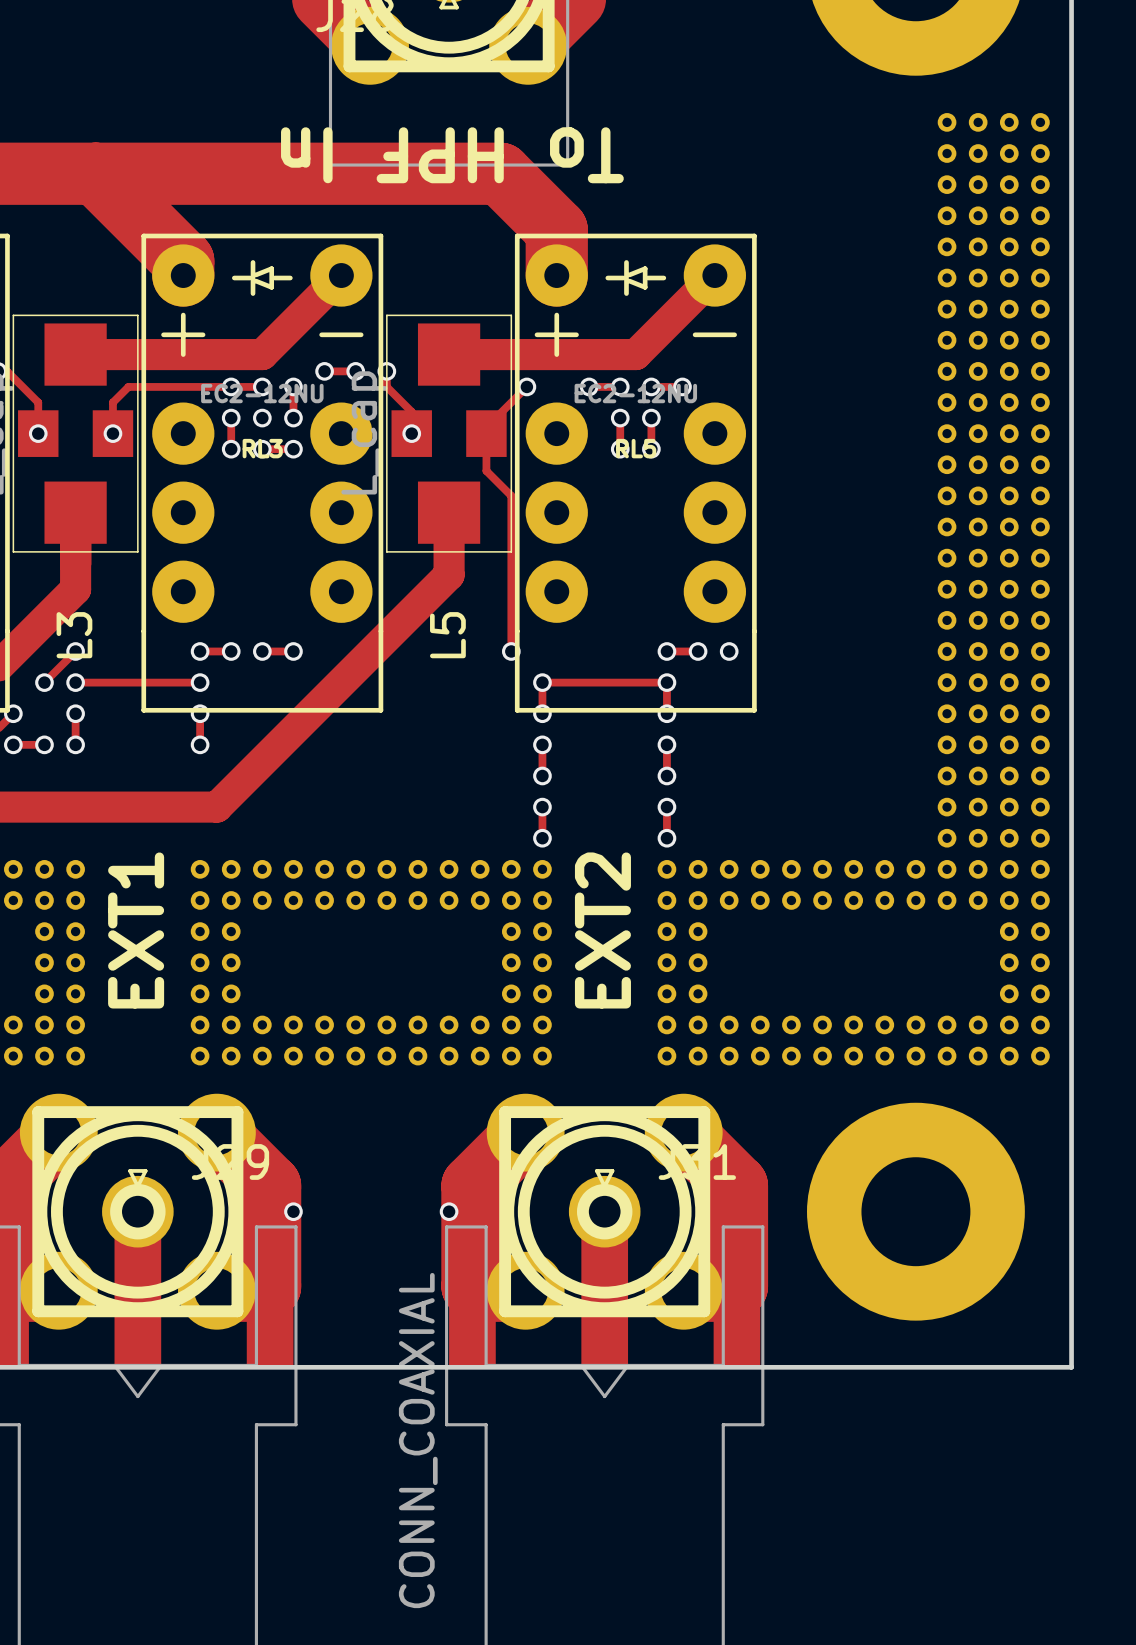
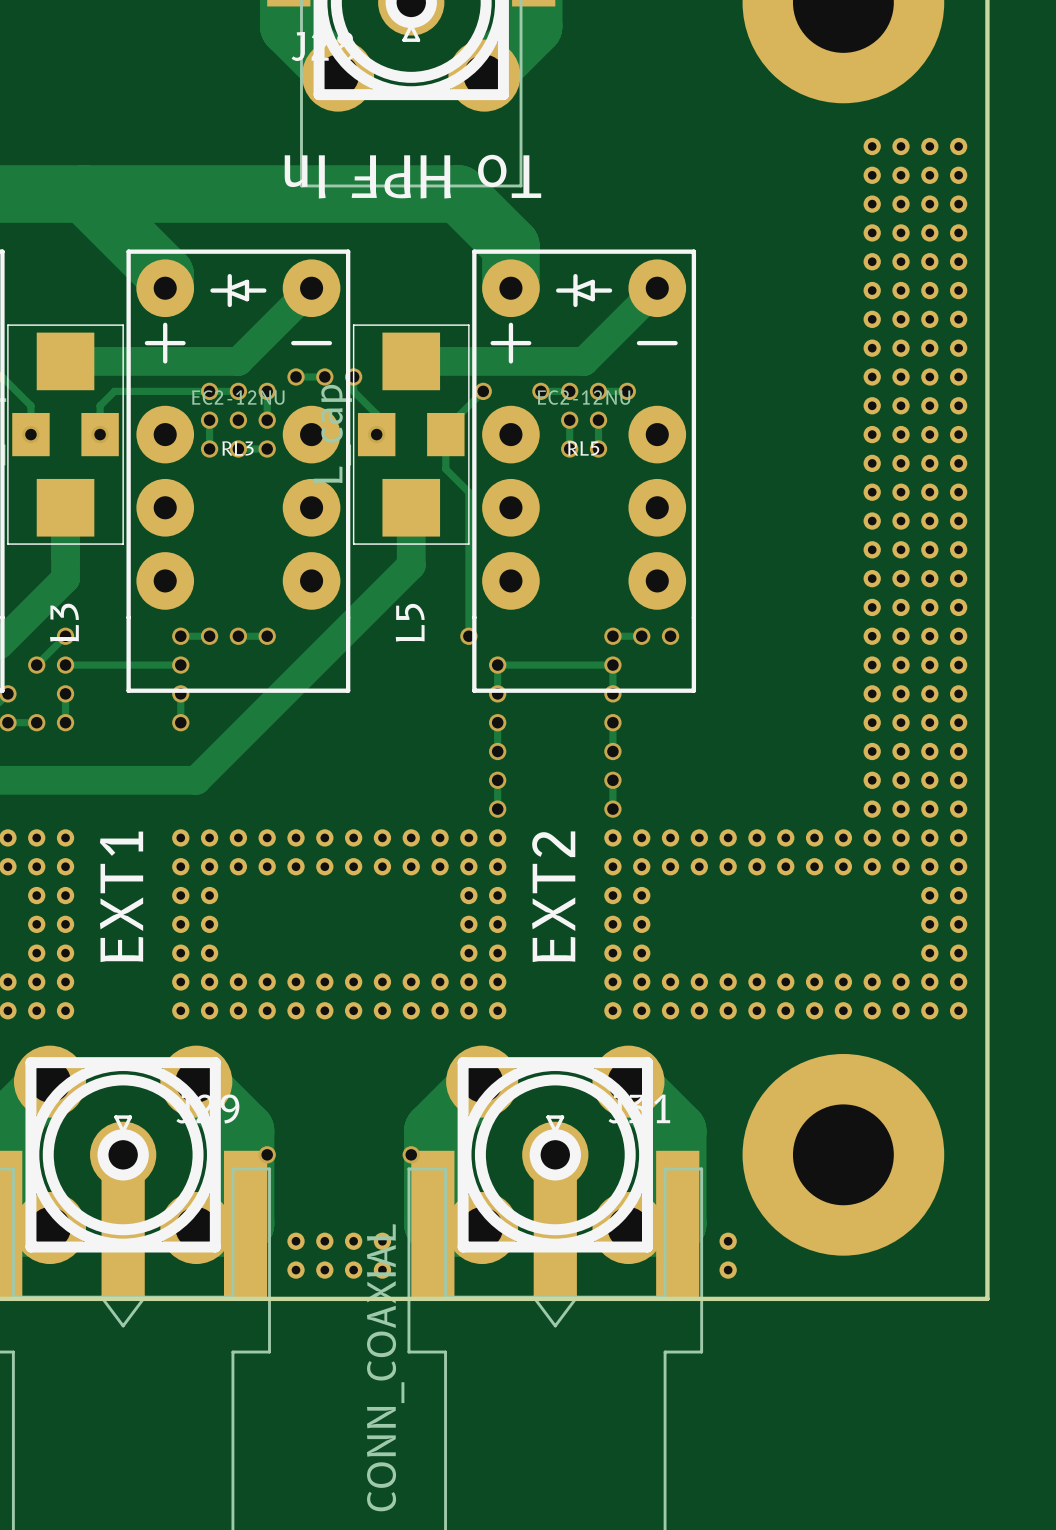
part: none -> (296, 1241)
part: none -> (324, 1241)
part: none -> (353, 1241)
part: none -> (382, 1241)
part: none -> (728, 1241)
part: none -> (296, 1270)
part: none -> (324, 1270)
part: none -> (353, 1270)
part: none -> (382, 1270)
part: none -> (728, 1270)

